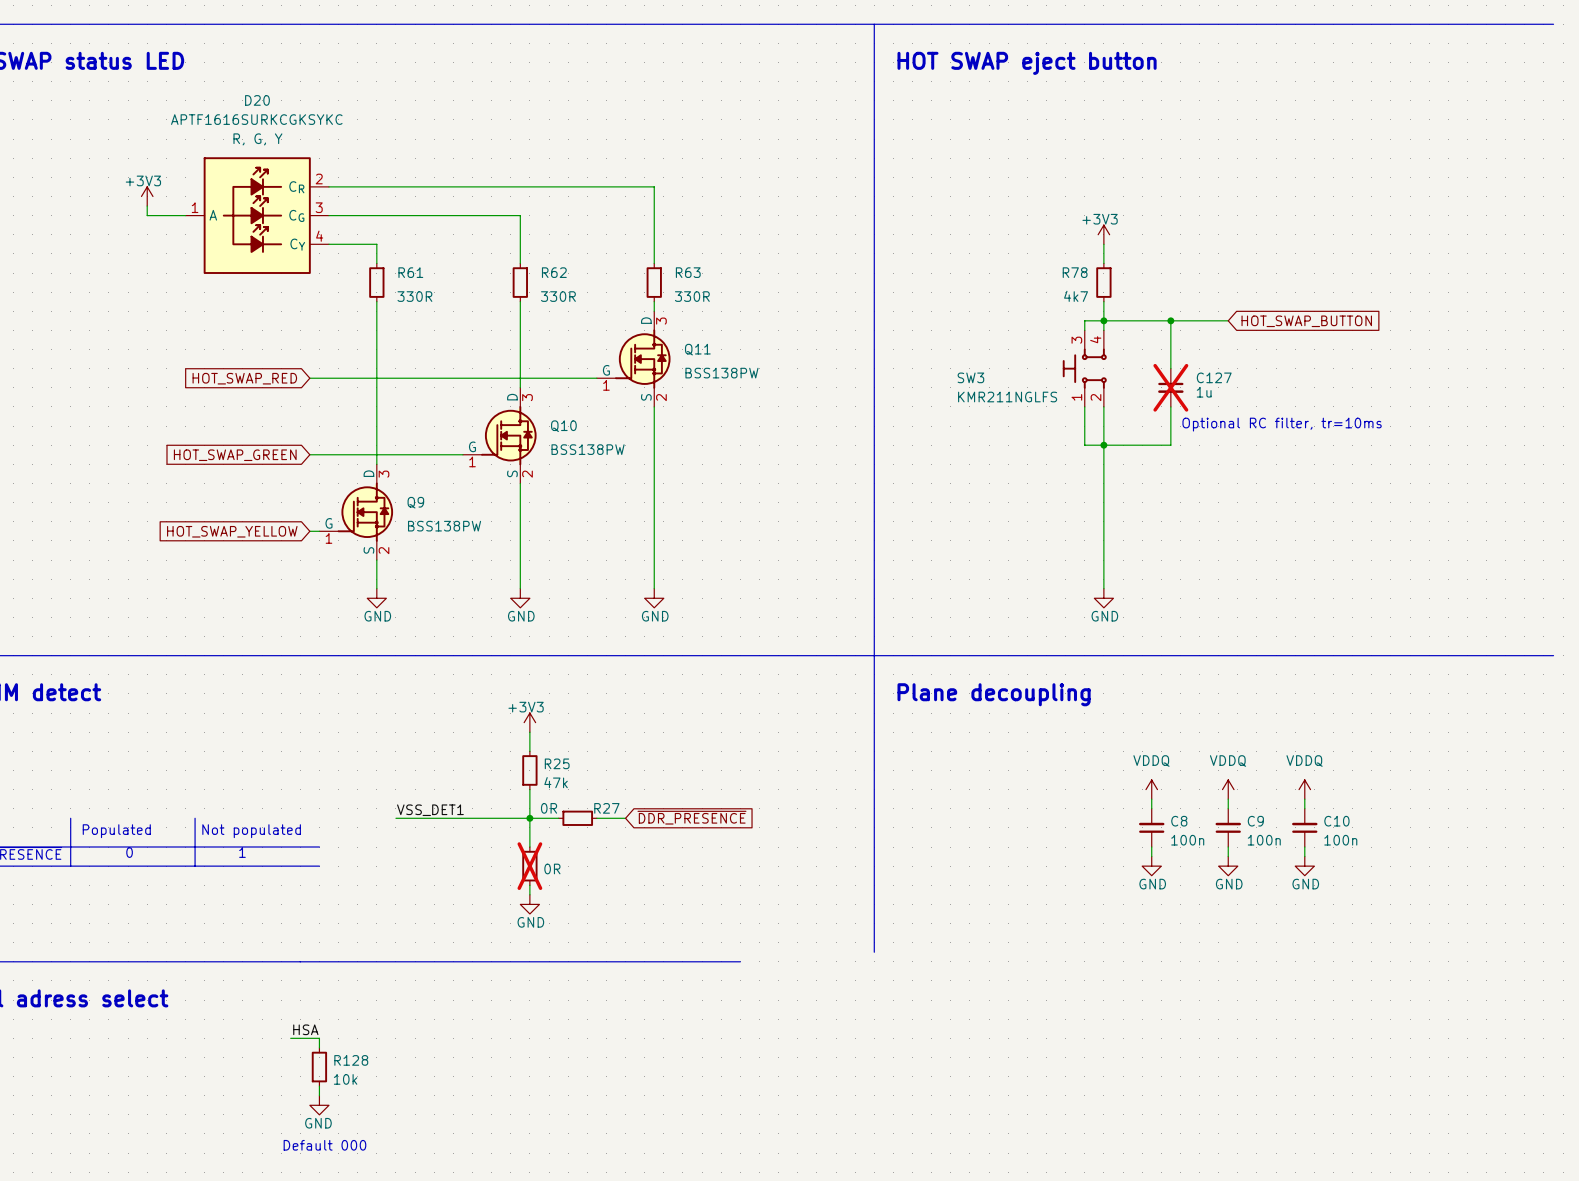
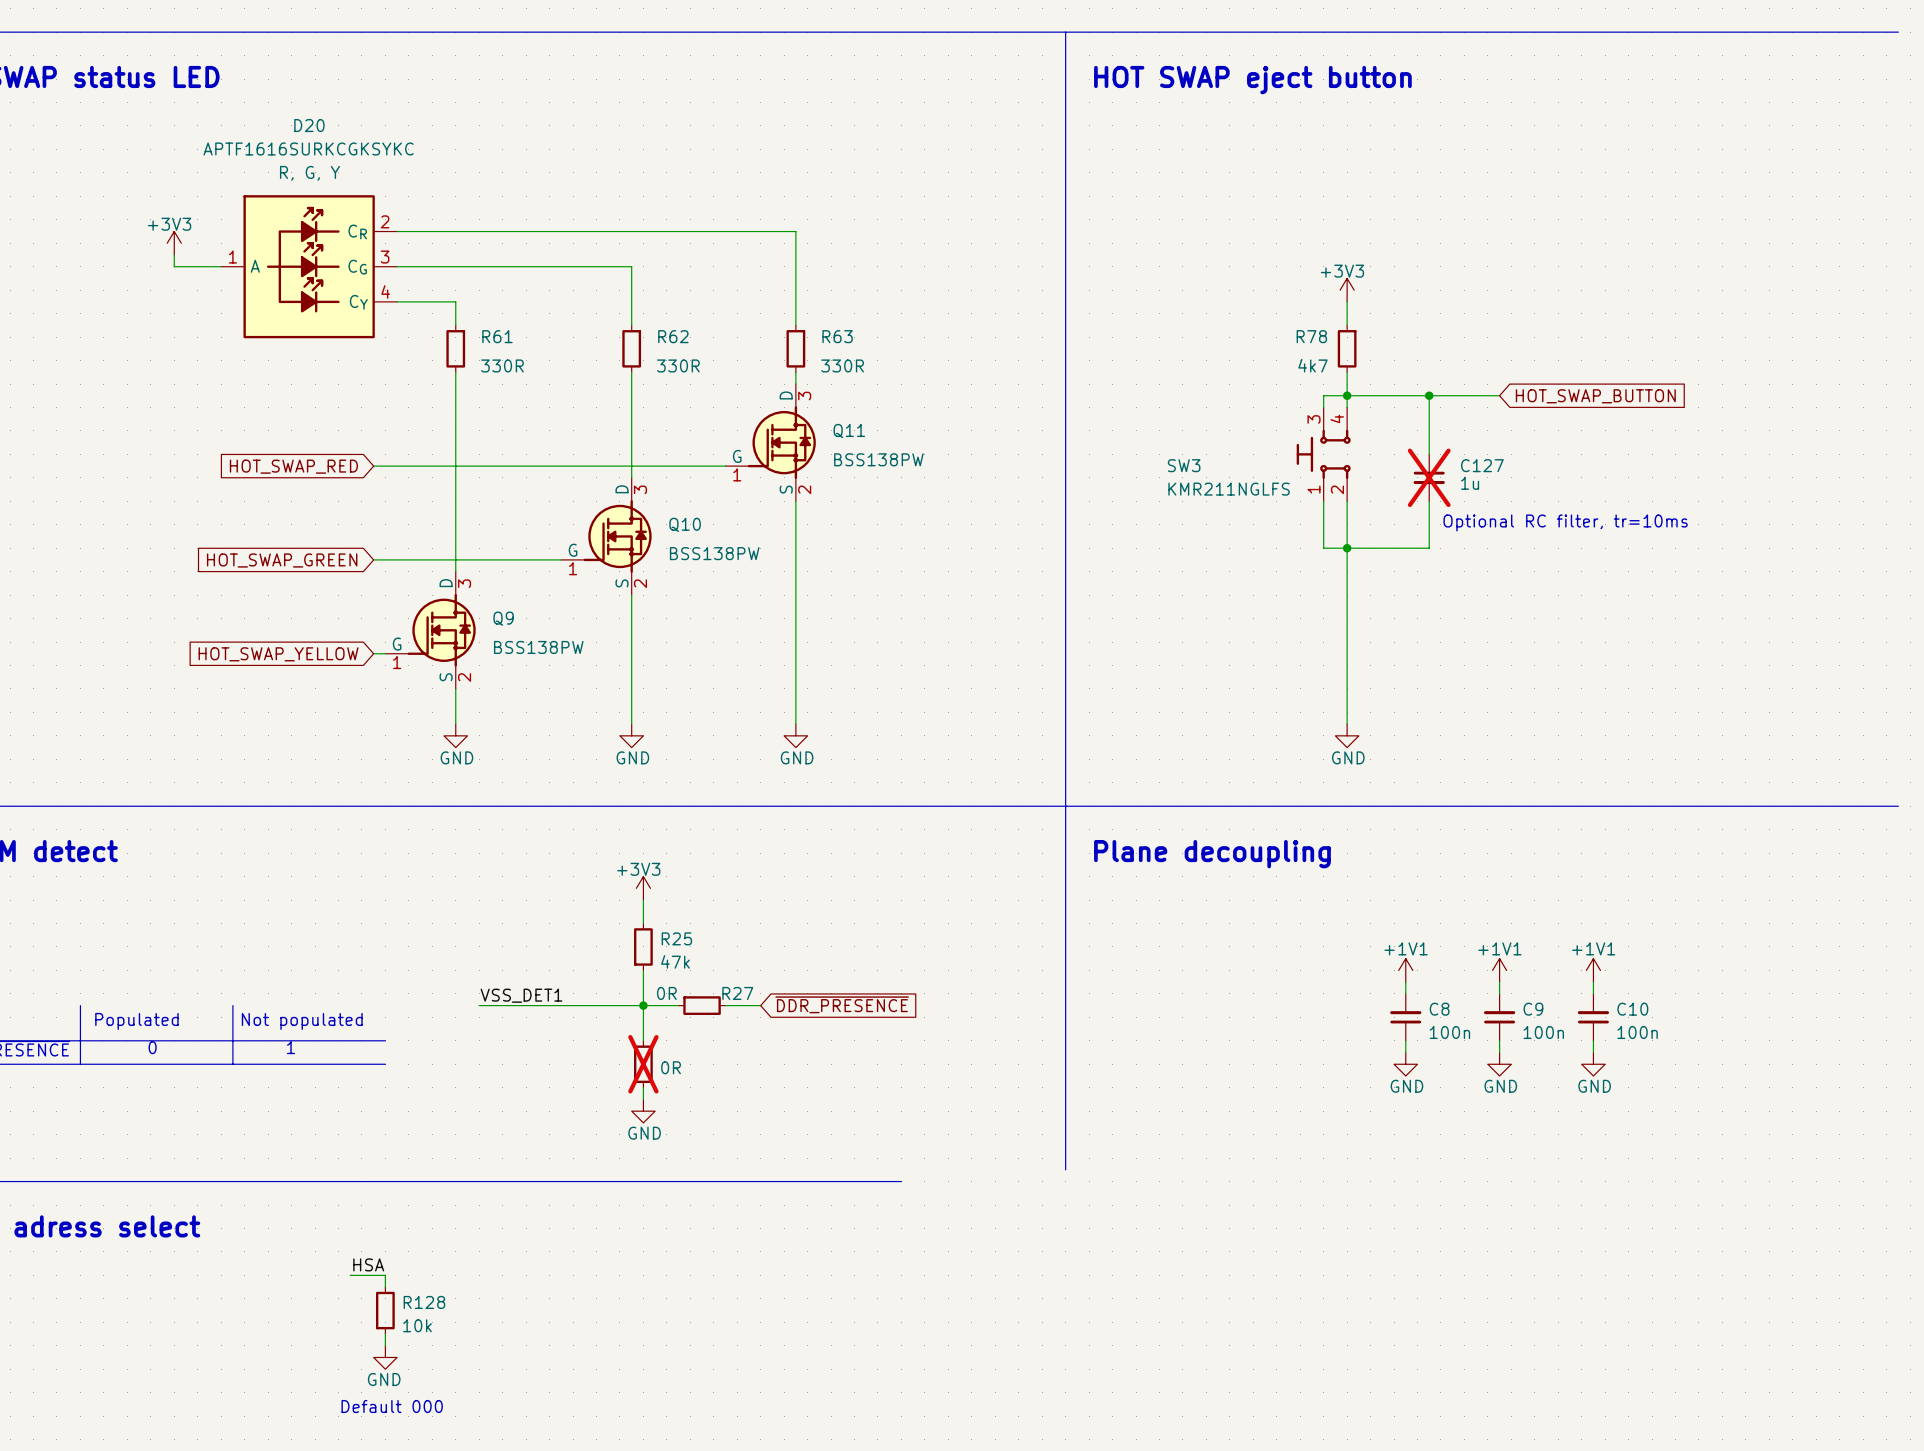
power symbol: VDDQ (1151, 789) -> +1V1 (1405, 970)
power symbol: VDDQ (1228, 789) -> +1V1 (1499, 970)
power symbol: VDDQ (1304, 789) -> +1V1 (1593, 970)

